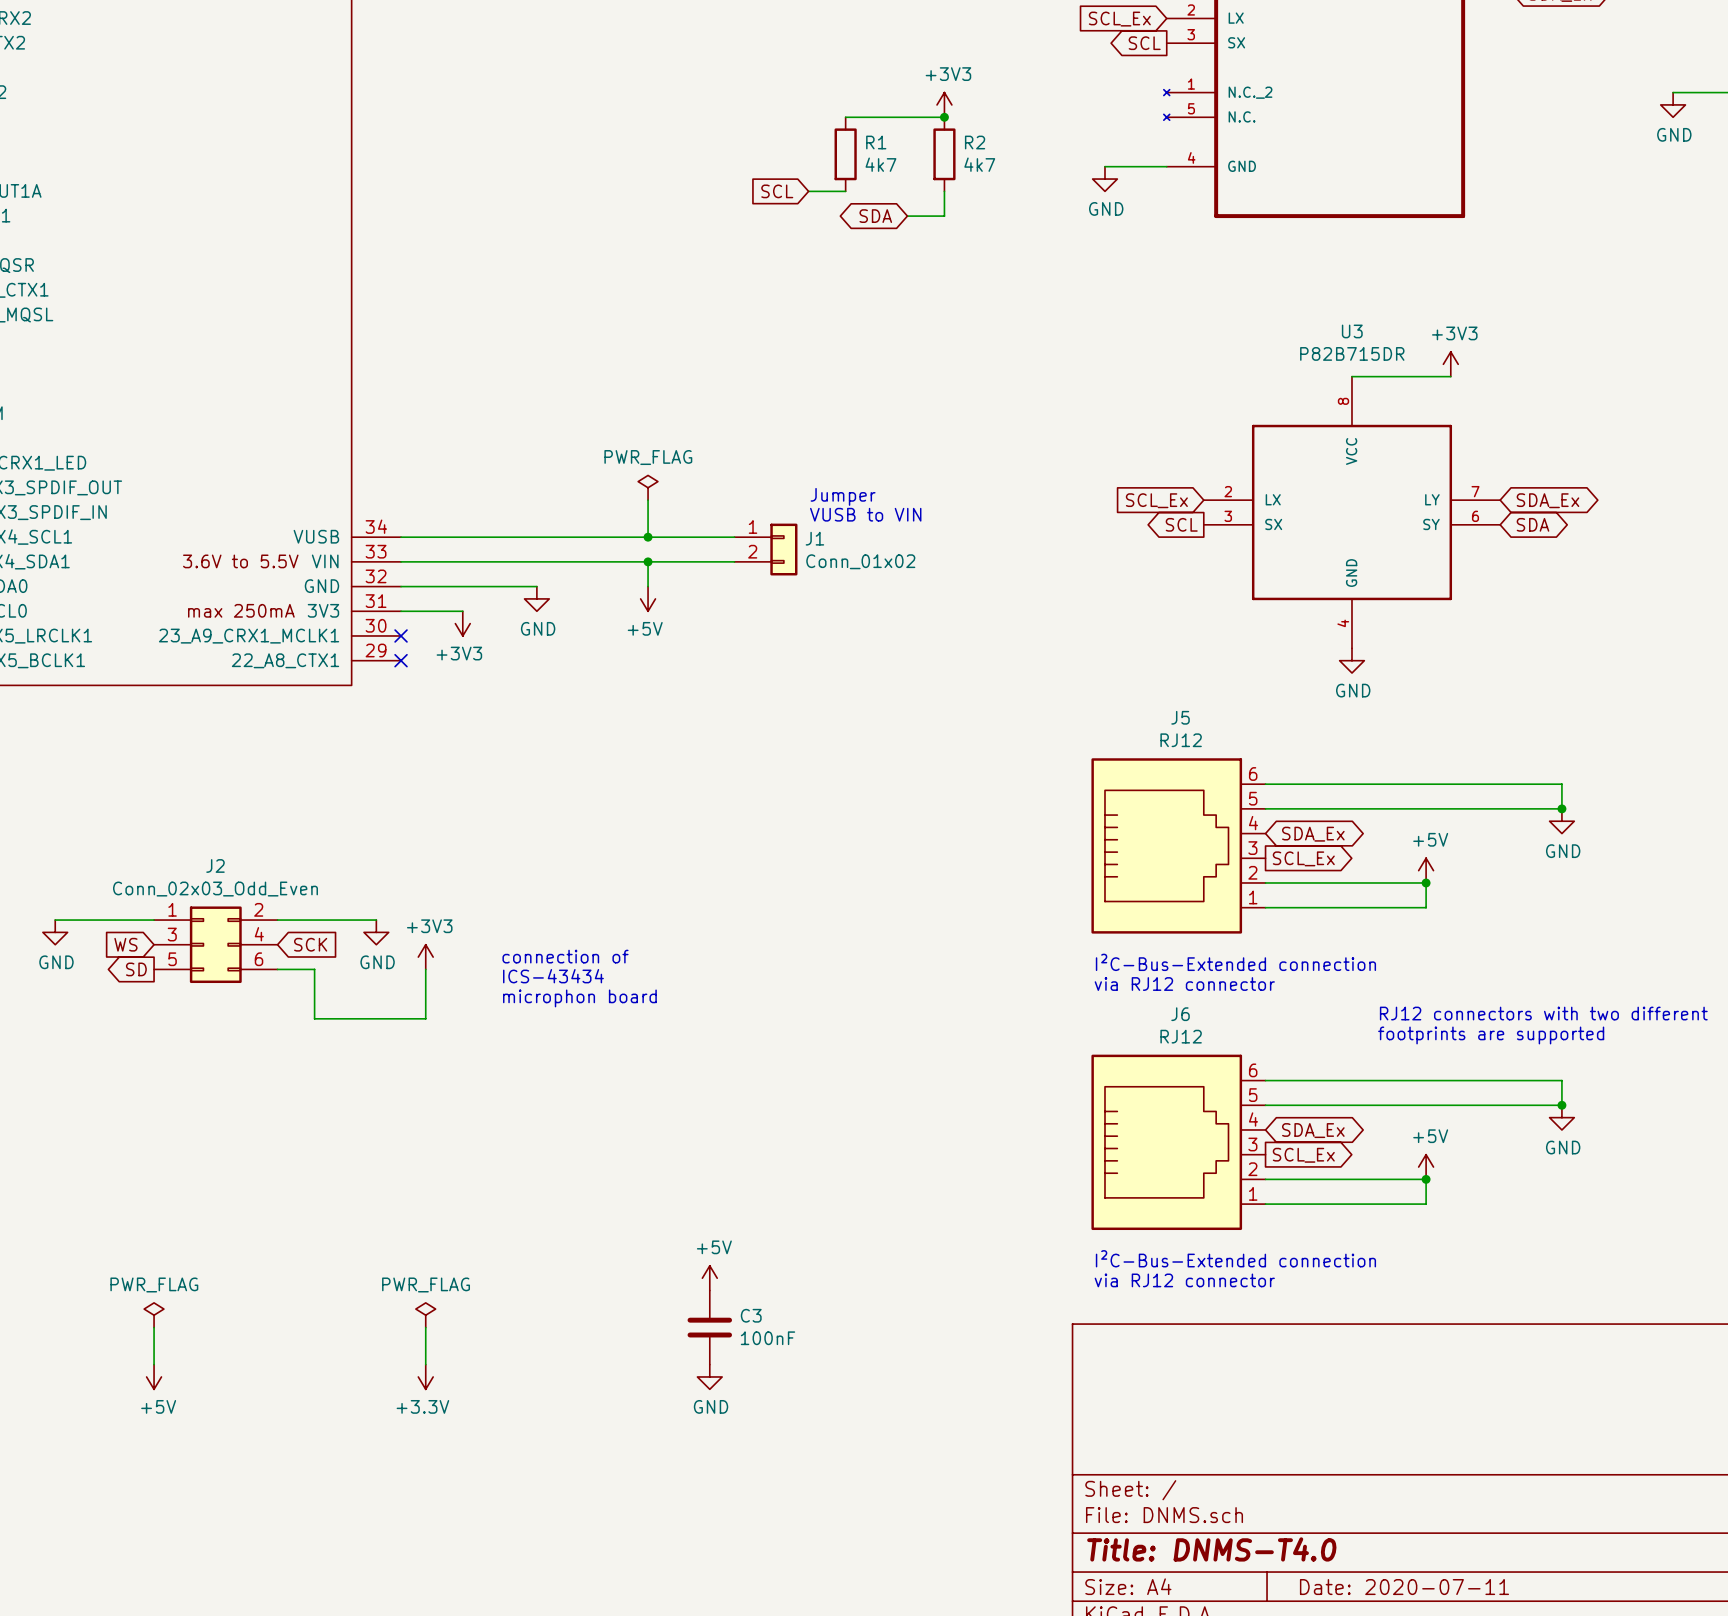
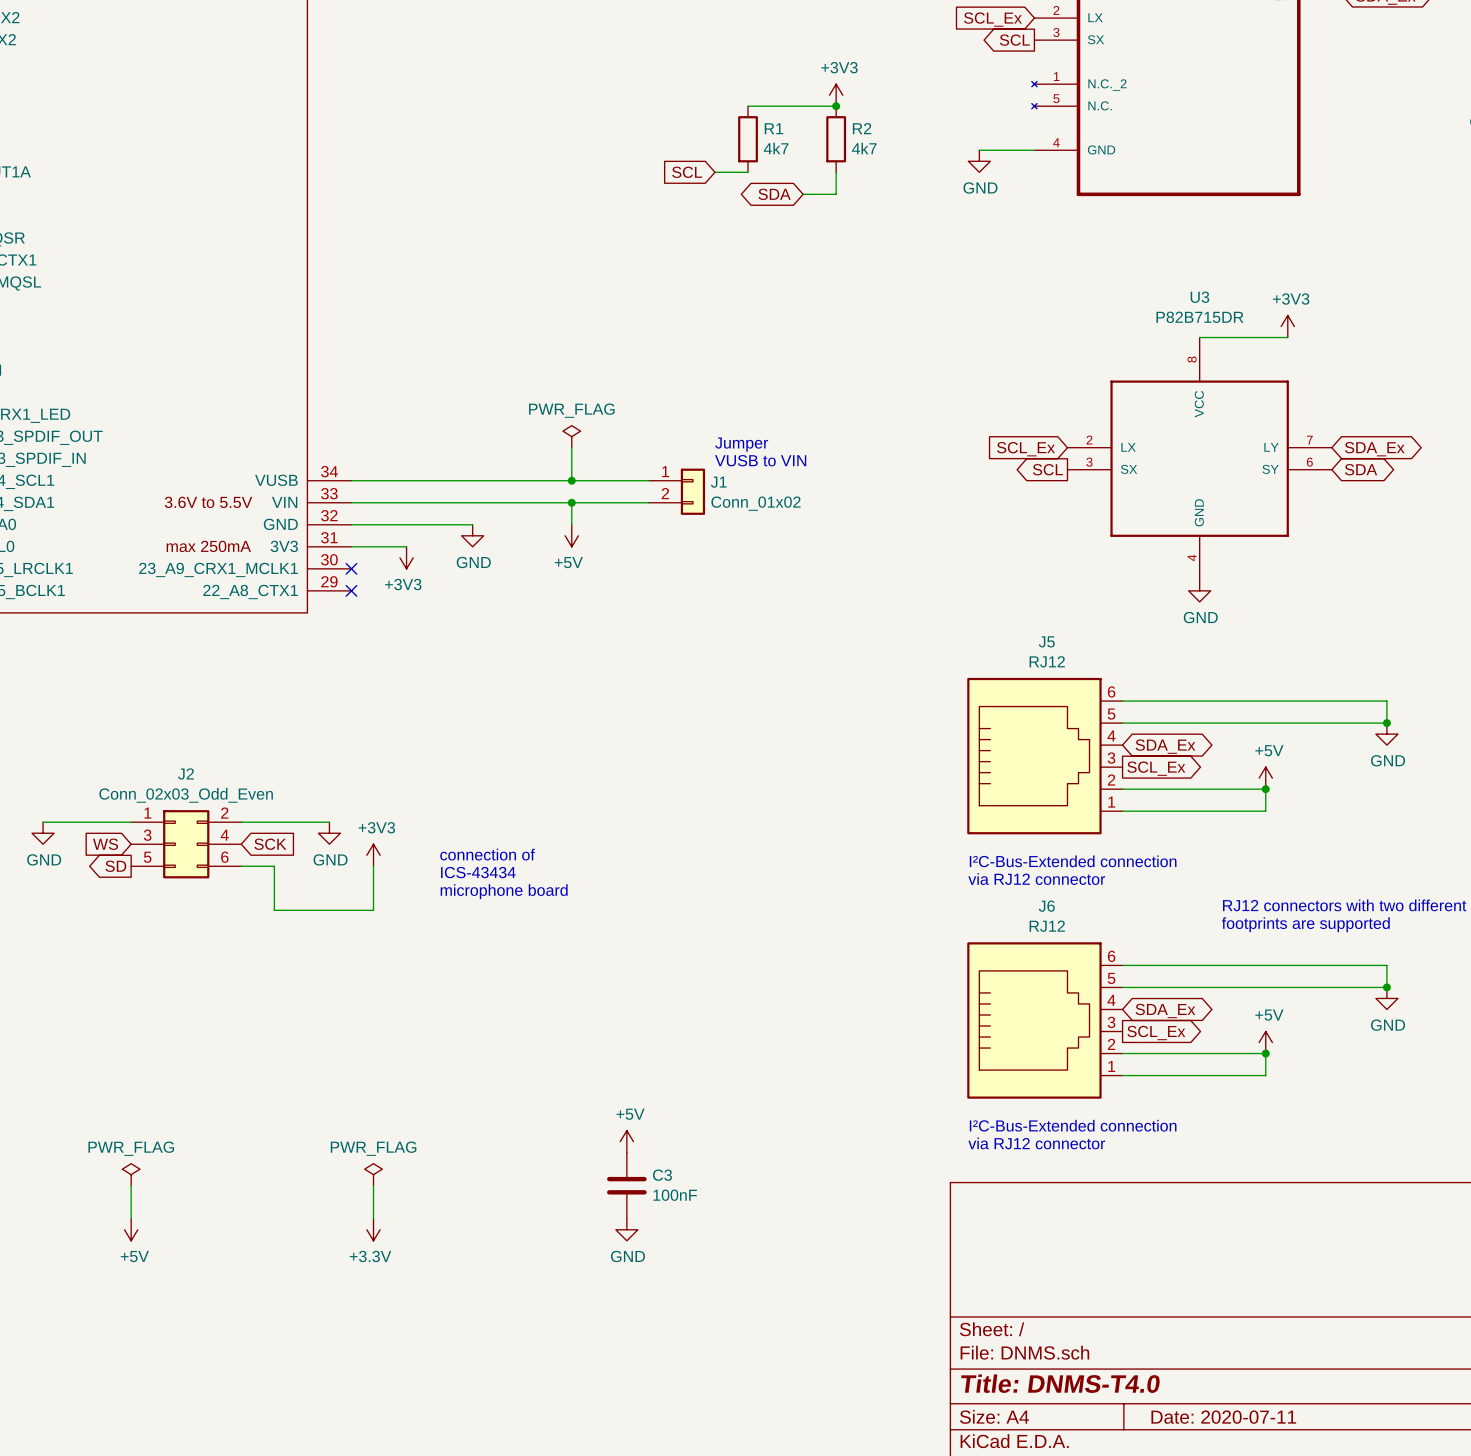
text: microphon board (579, 998) -> microphone board (504, 891)

